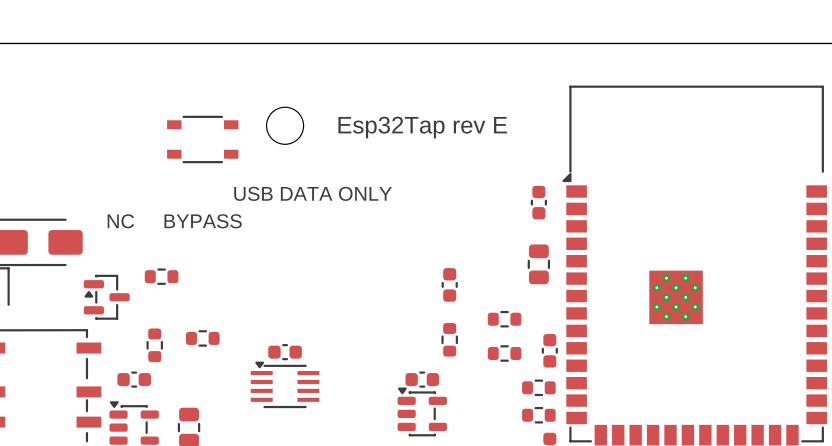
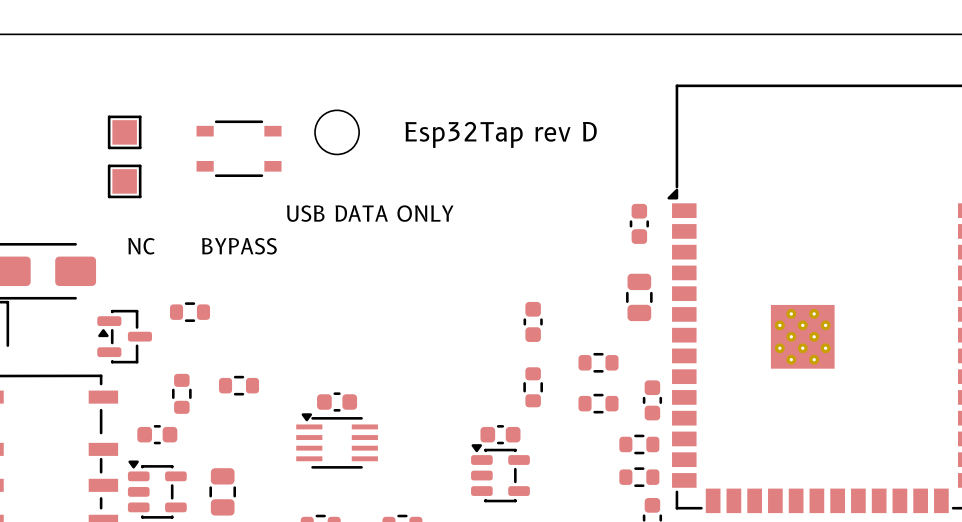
part: none -> (124, 132)
text: Esp32Tap rev E (422, 127) -> Esp32Tap rev D (501, 134)
part: none -> (124, 181)

